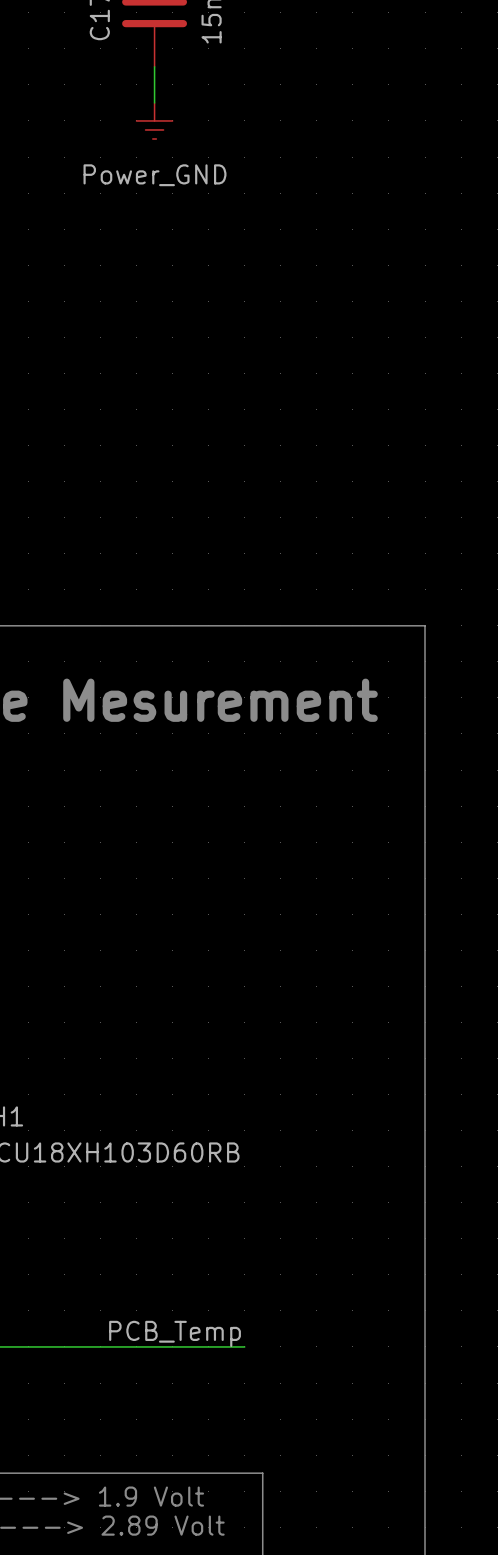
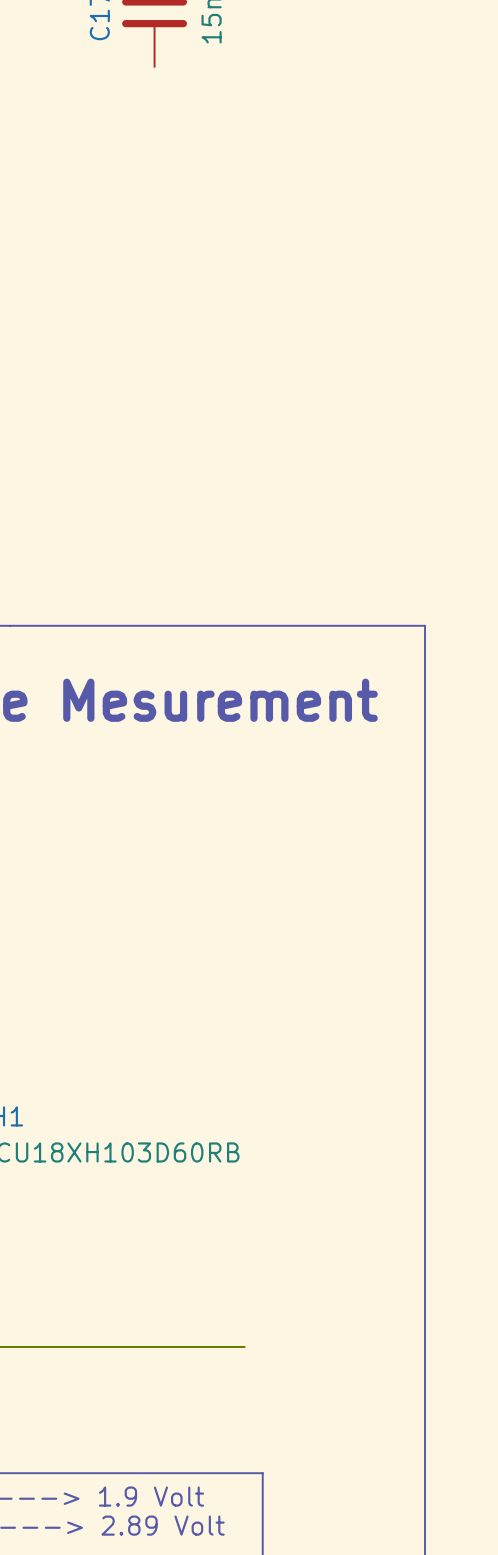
wire: (154, 66) (154, 102) -> none
power symbol: Power_GND (154, 120) -> none
label: PCB_Temp (175, 1333) -> none

